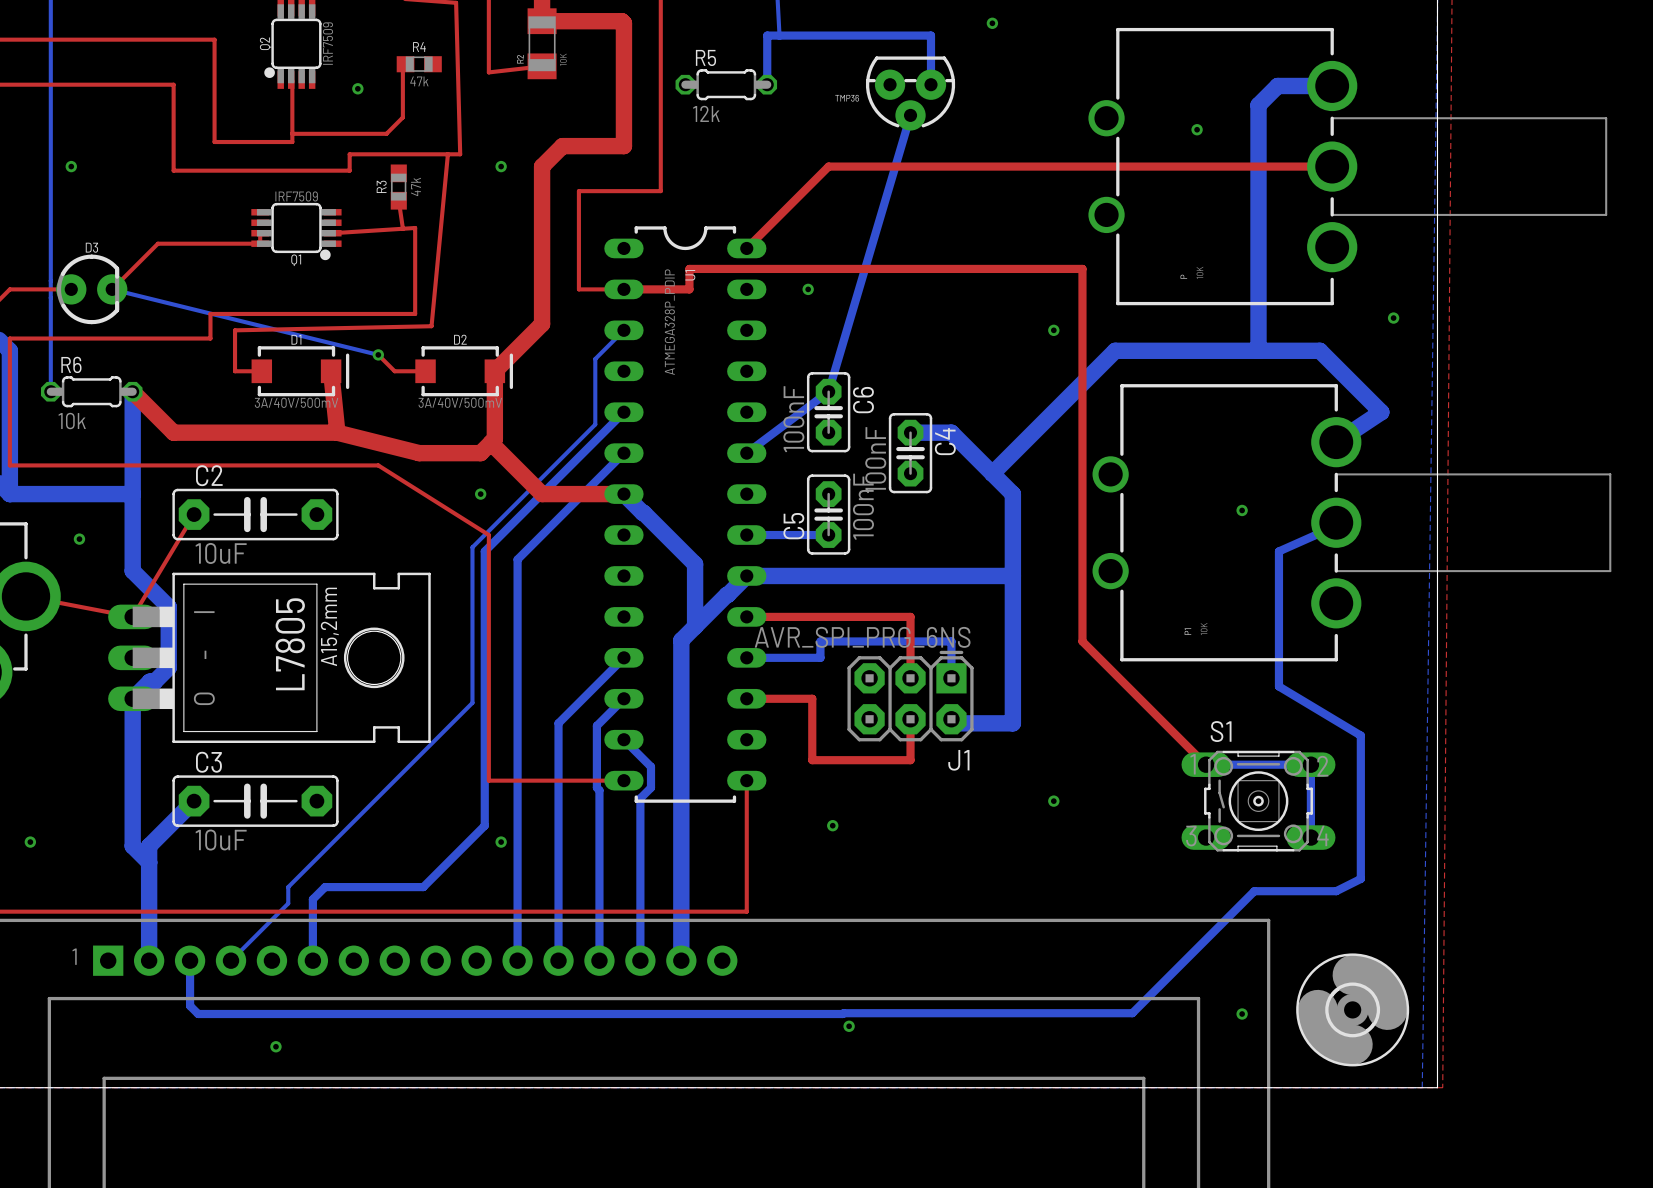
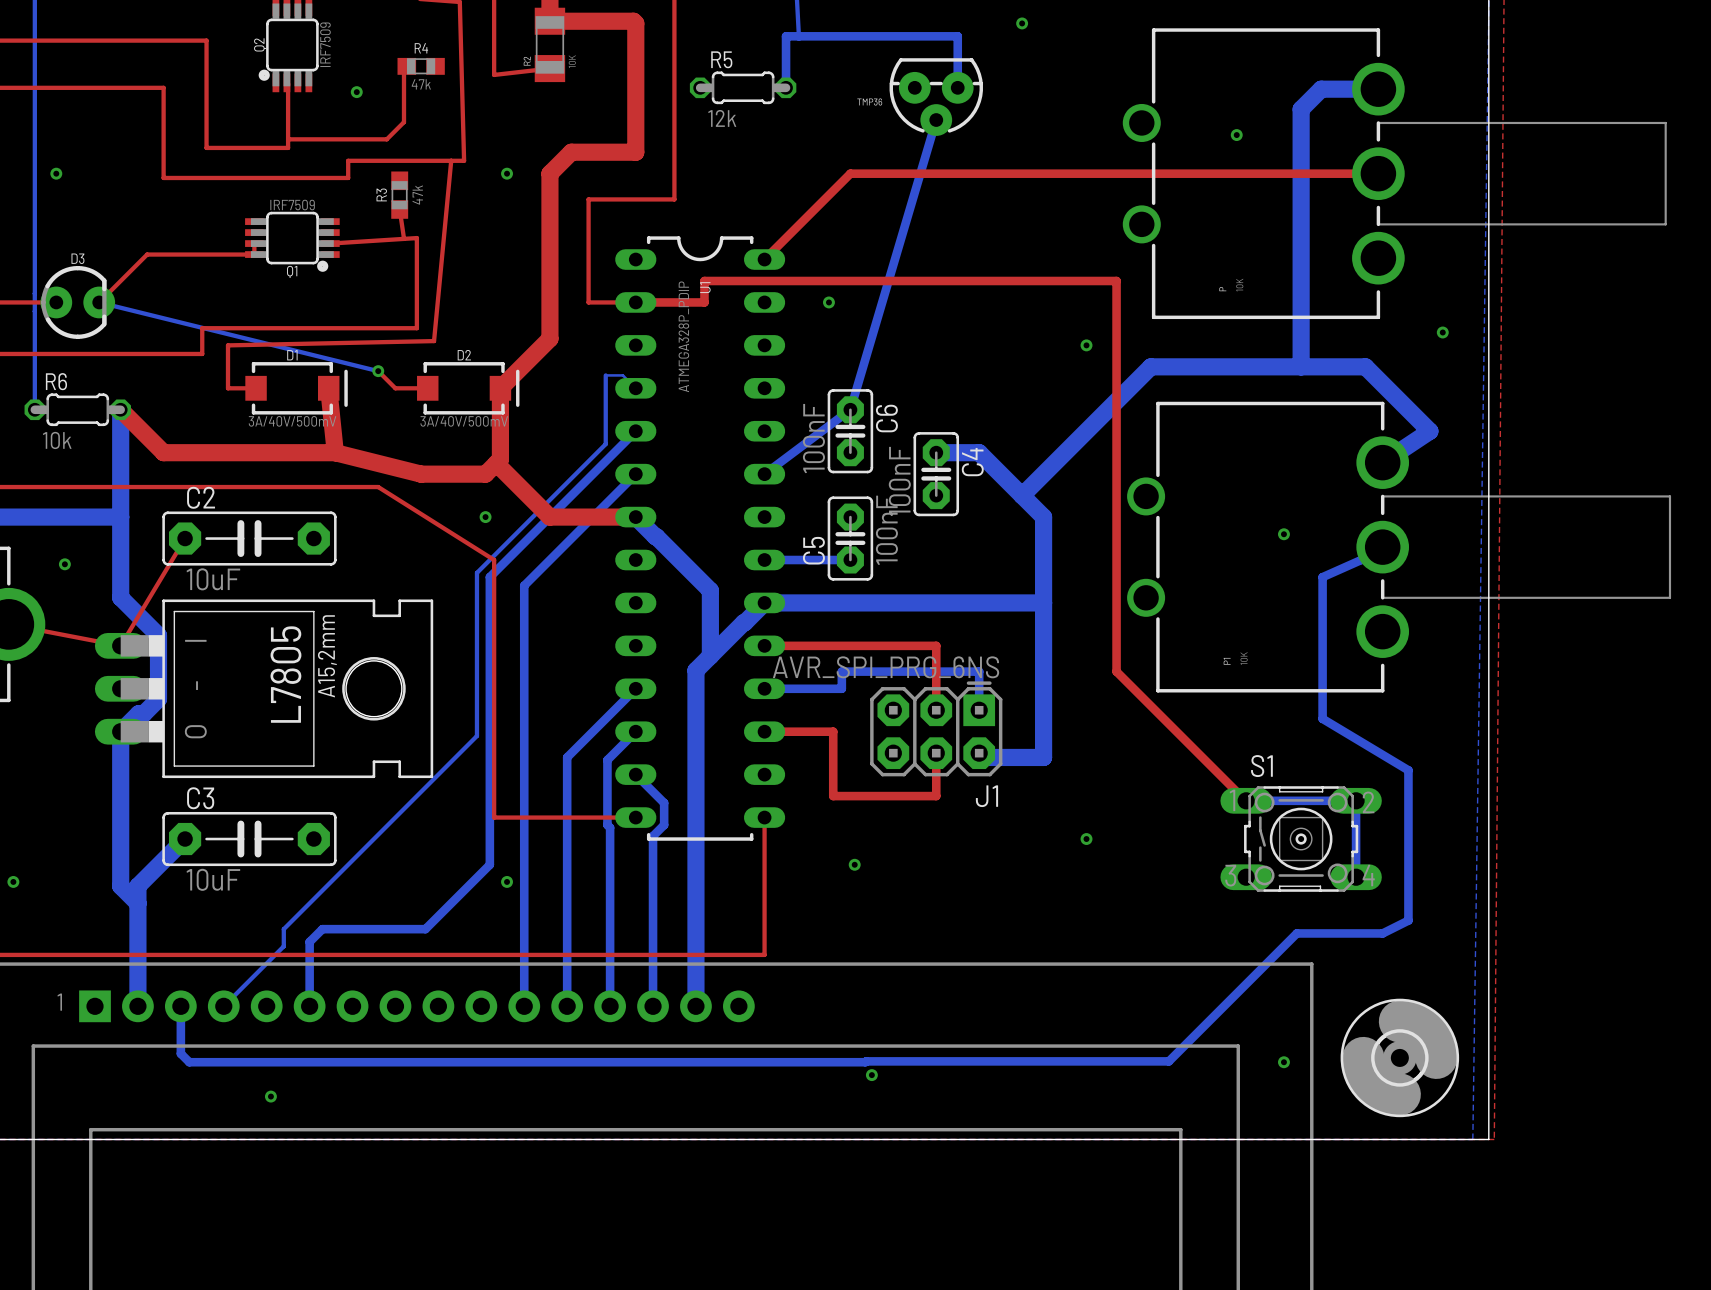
bottom track: (623, 330) (595, 358) -> (635, 388) (622, 375) (605, 375)

